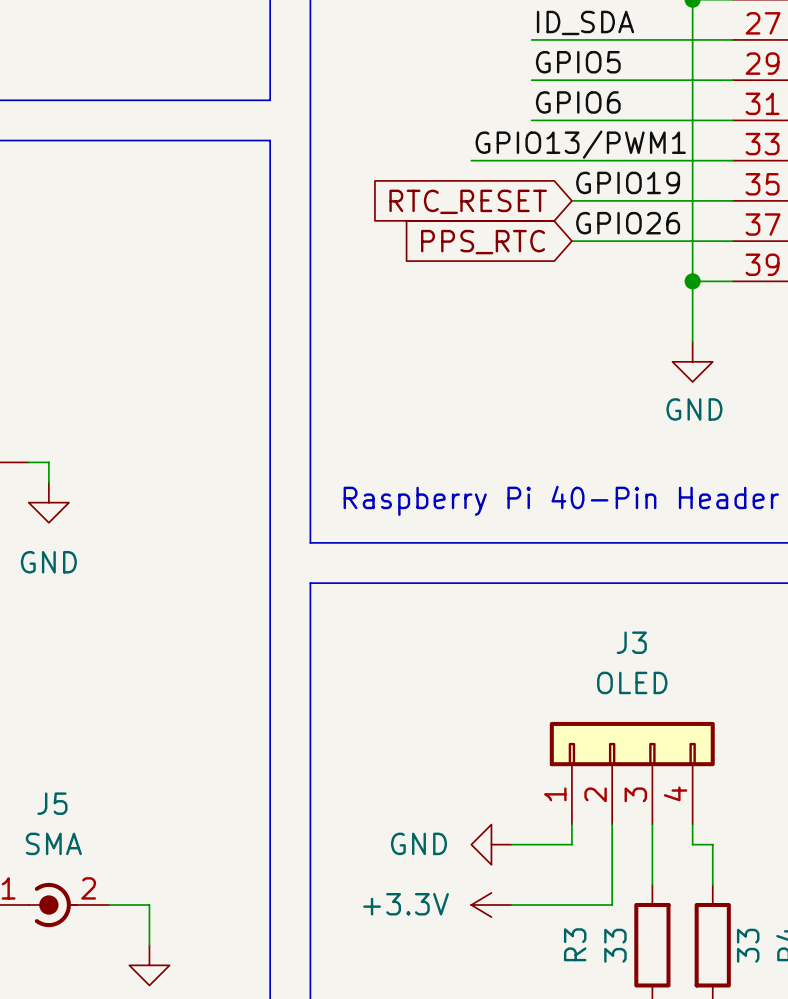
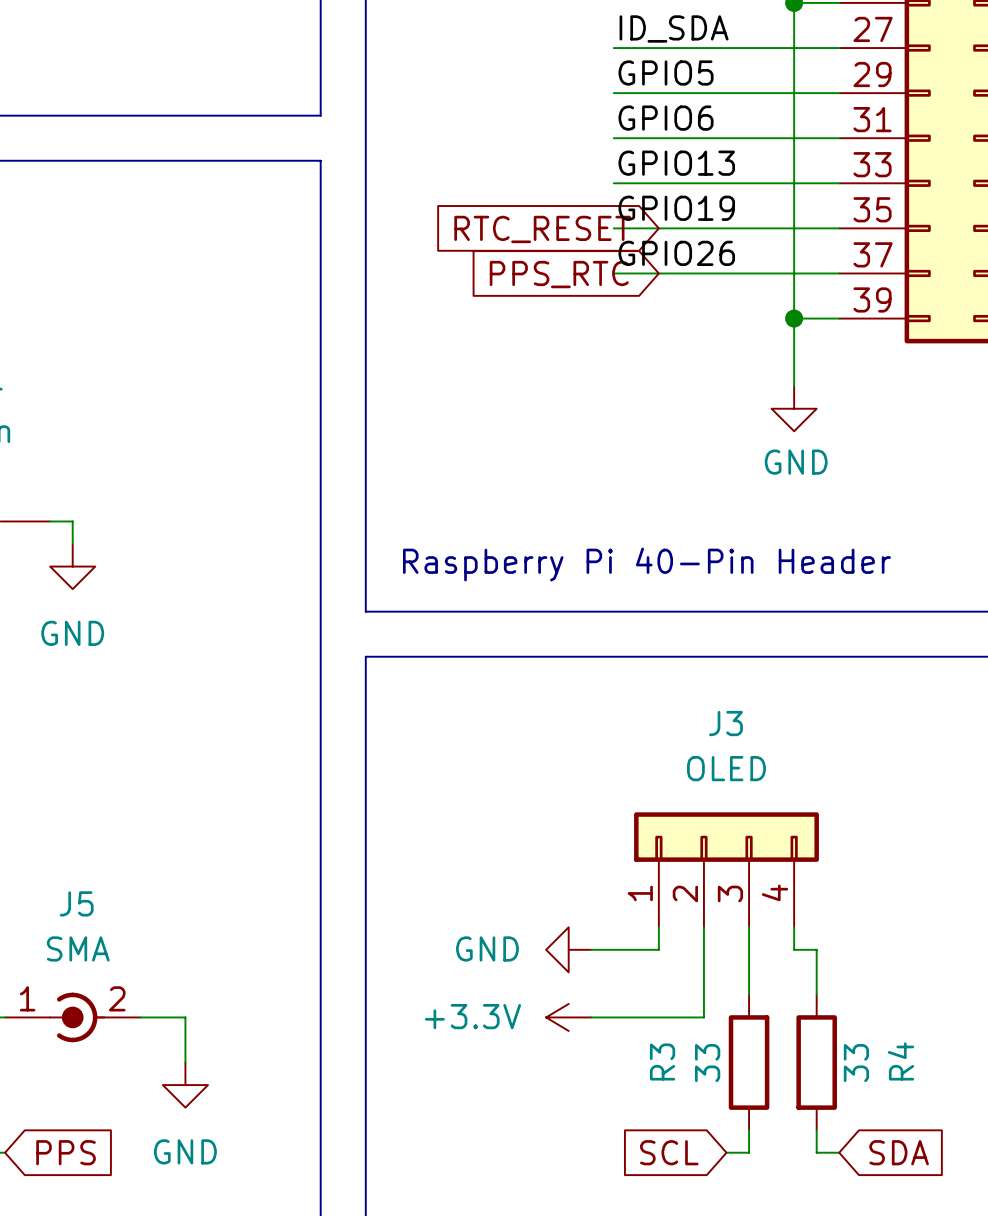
label: GPIO13/PWM1 (580, 144) -> GPIO13 (676, 163)
wire: (471, 160) (531, 160) -> none
label position: GPIO19 (628, 182) -> GPIO19 (676, 208)
wire: none -> (613, 228) (658, 228)
label position: GPIO26 (628, 223) -> GPIO26 (676, 253)
wire: none -> (613, 273) (658, 273)

